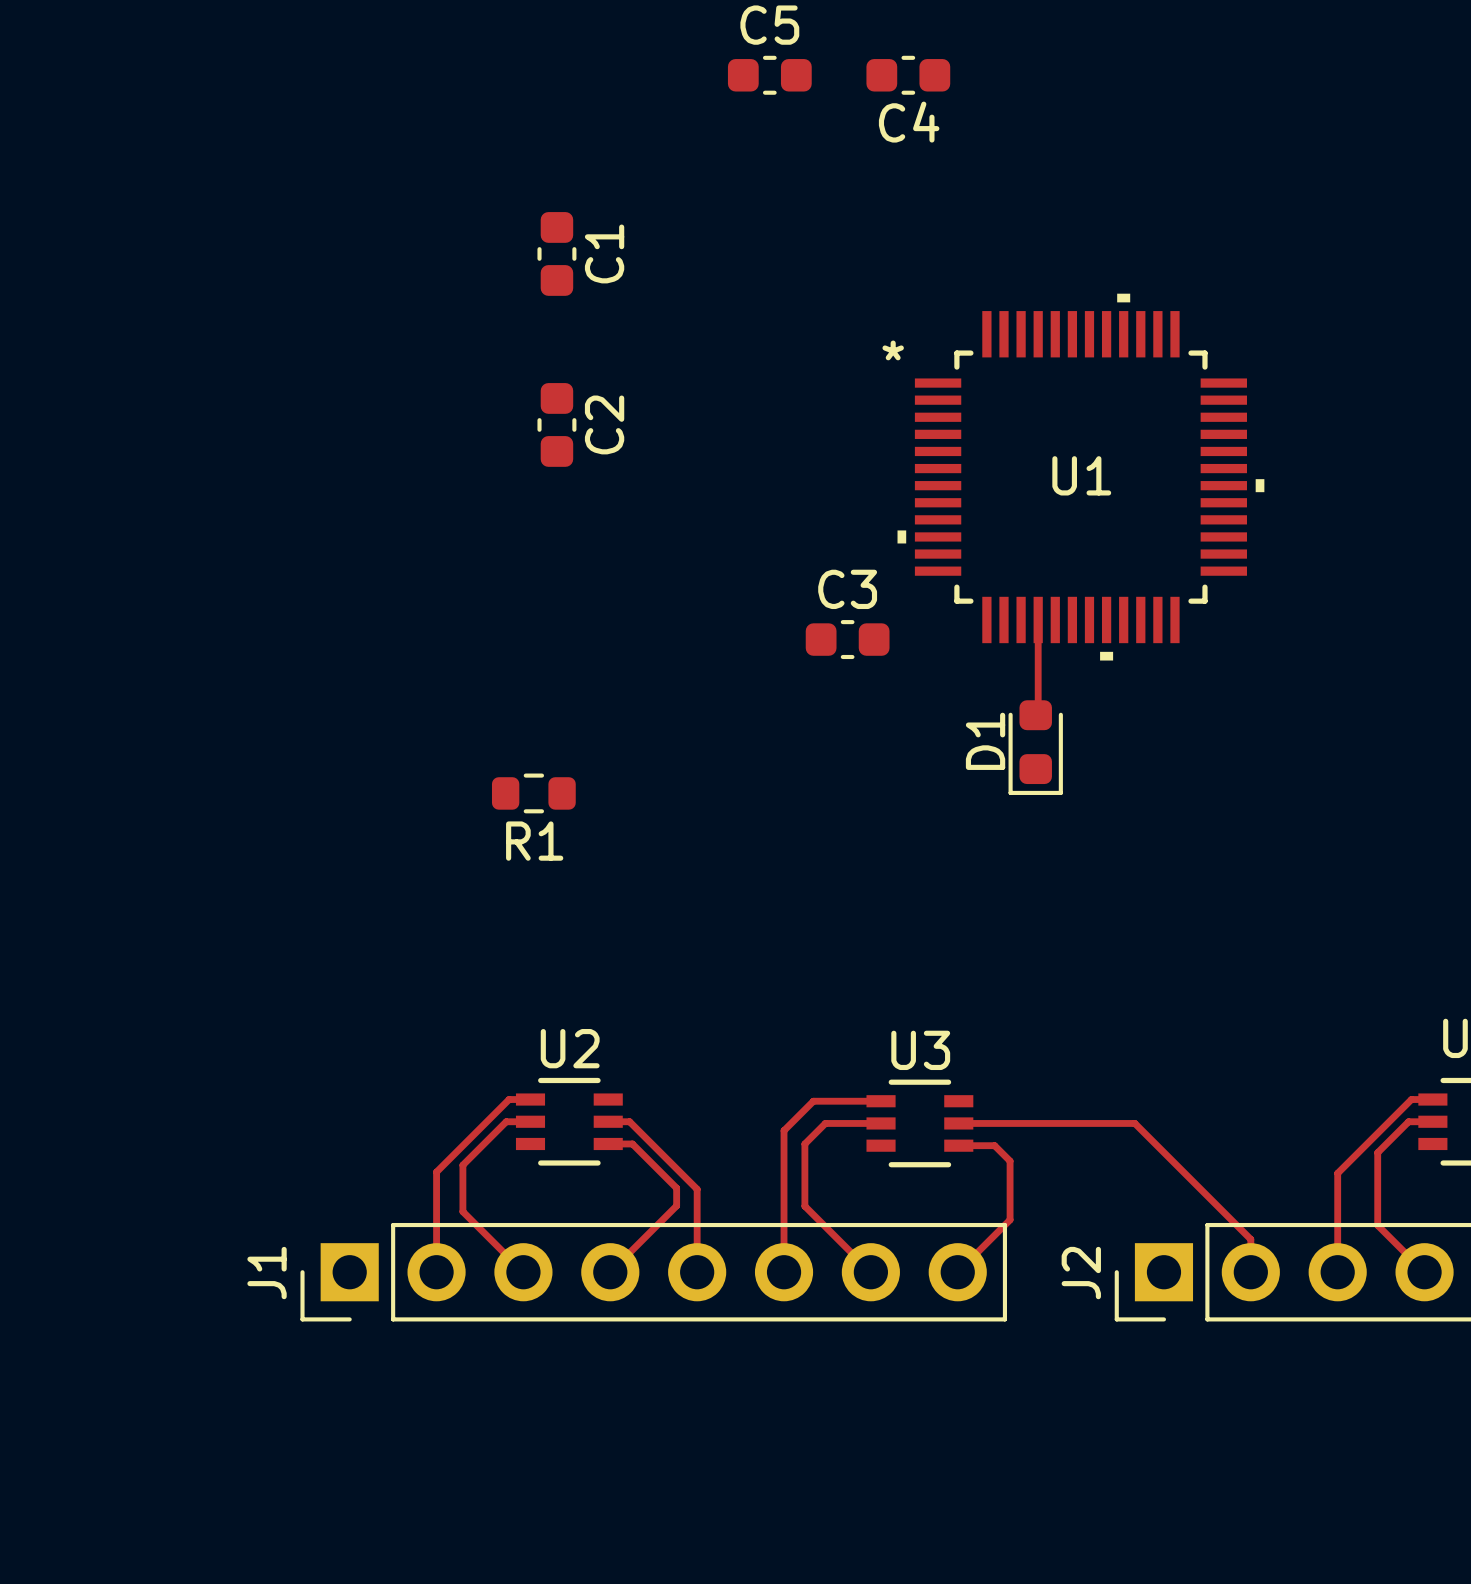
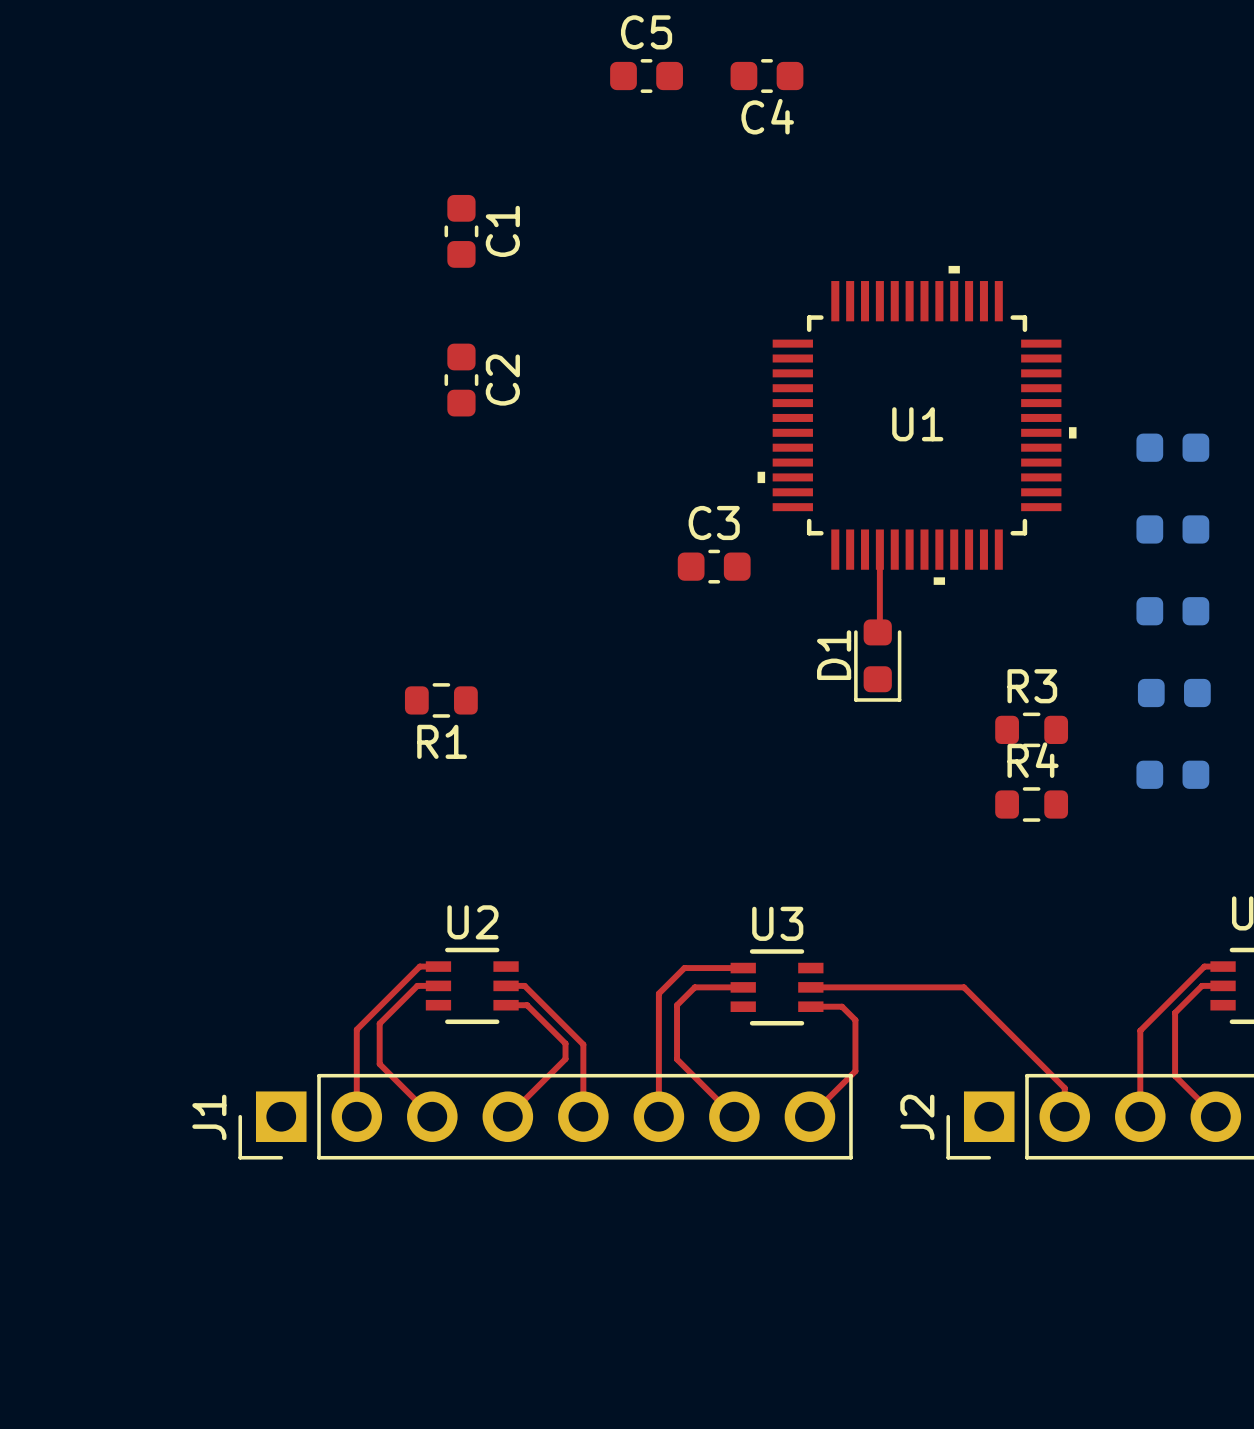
U1 text: * (893, 350) -> none
part: none -> (1172, 447)
part: none -> (1172, 529)
part: none -> (1172, 611)
part: none -> (1174, 693)
R3: none -> (1031, 729)
part: none -> (1172, 774)
R4: none -> (1031, 804)

